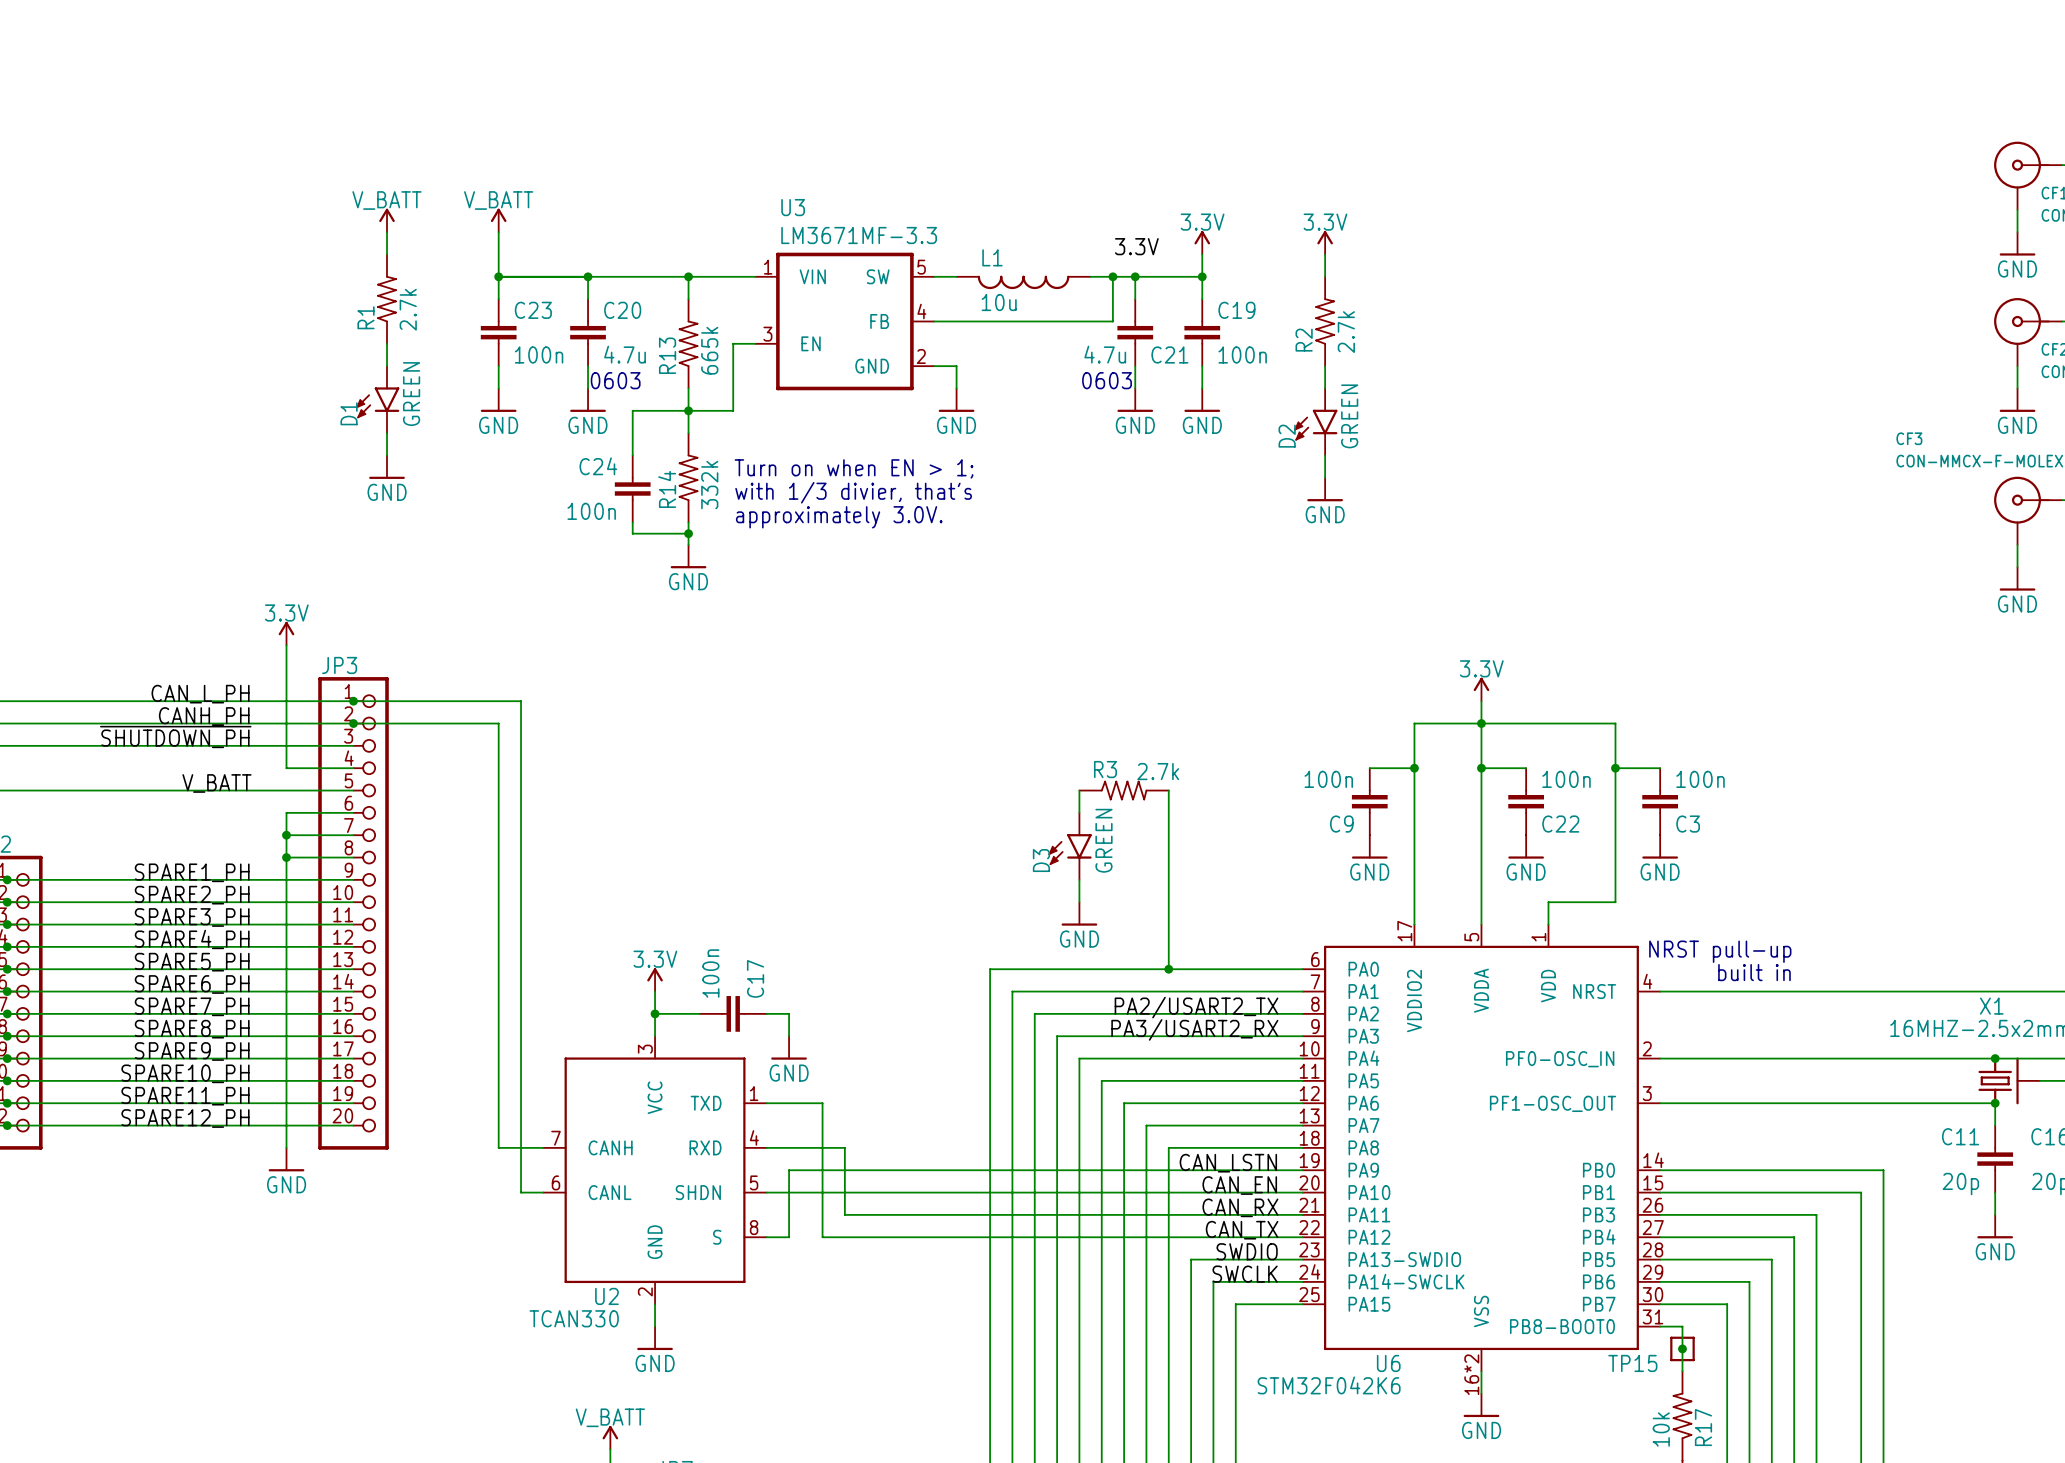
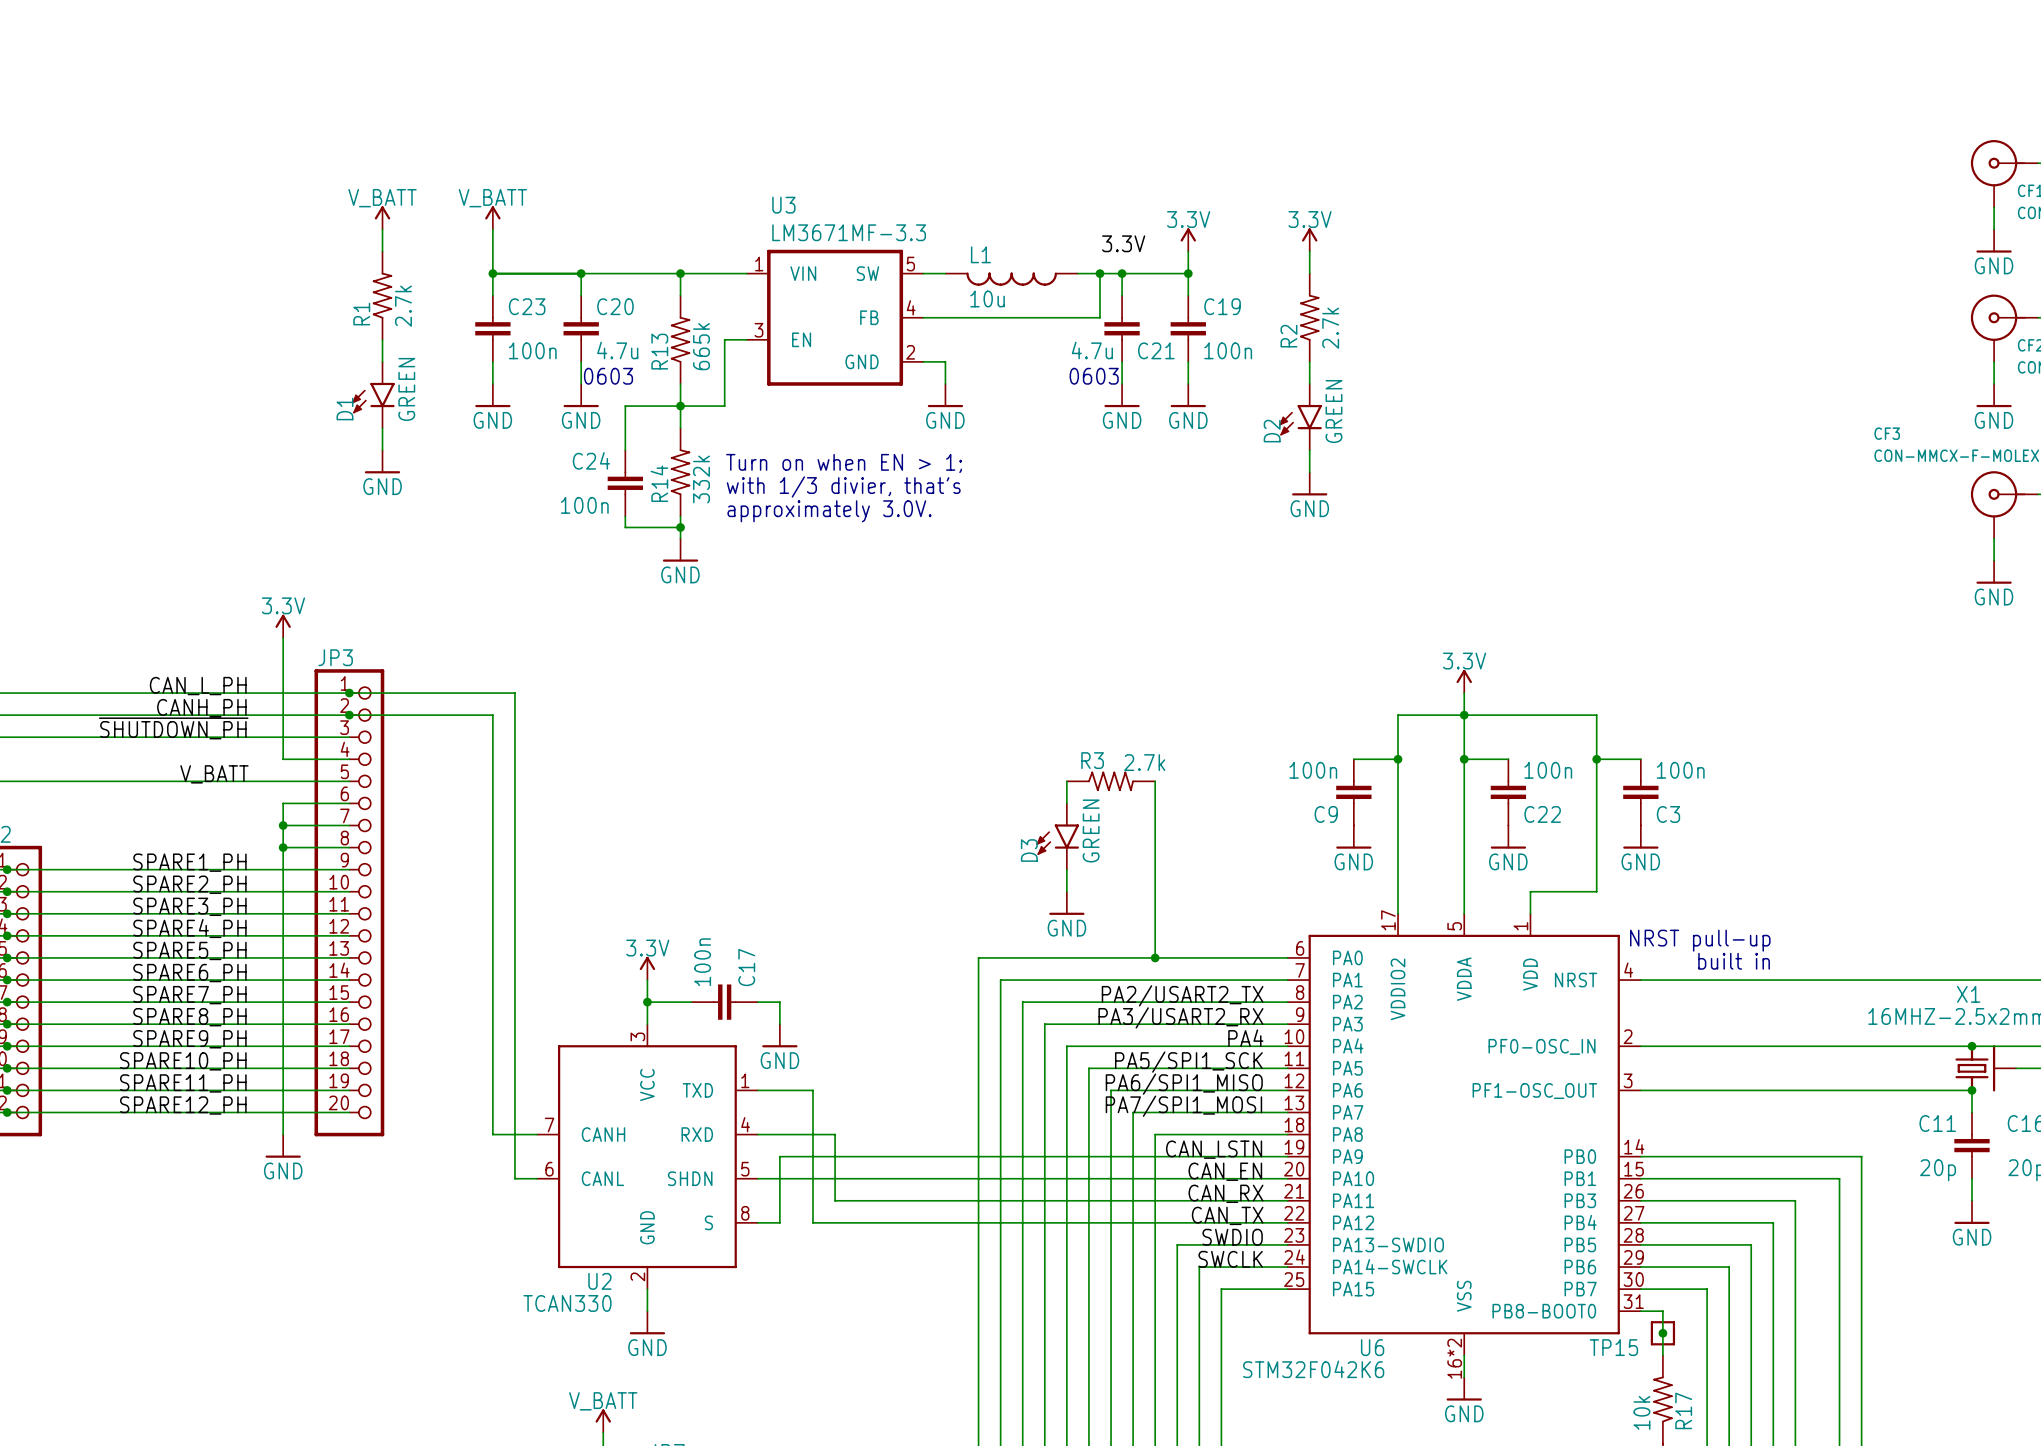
label: none -> PA4 (1245, 1038)
label: none -> PA5/SPI1_SCK (1188, 1062)
label: none -> PA6/SPI1_MISO (1184, 1084)
label: none -> PA7/SPI1_MOSI (1183, 1106)

